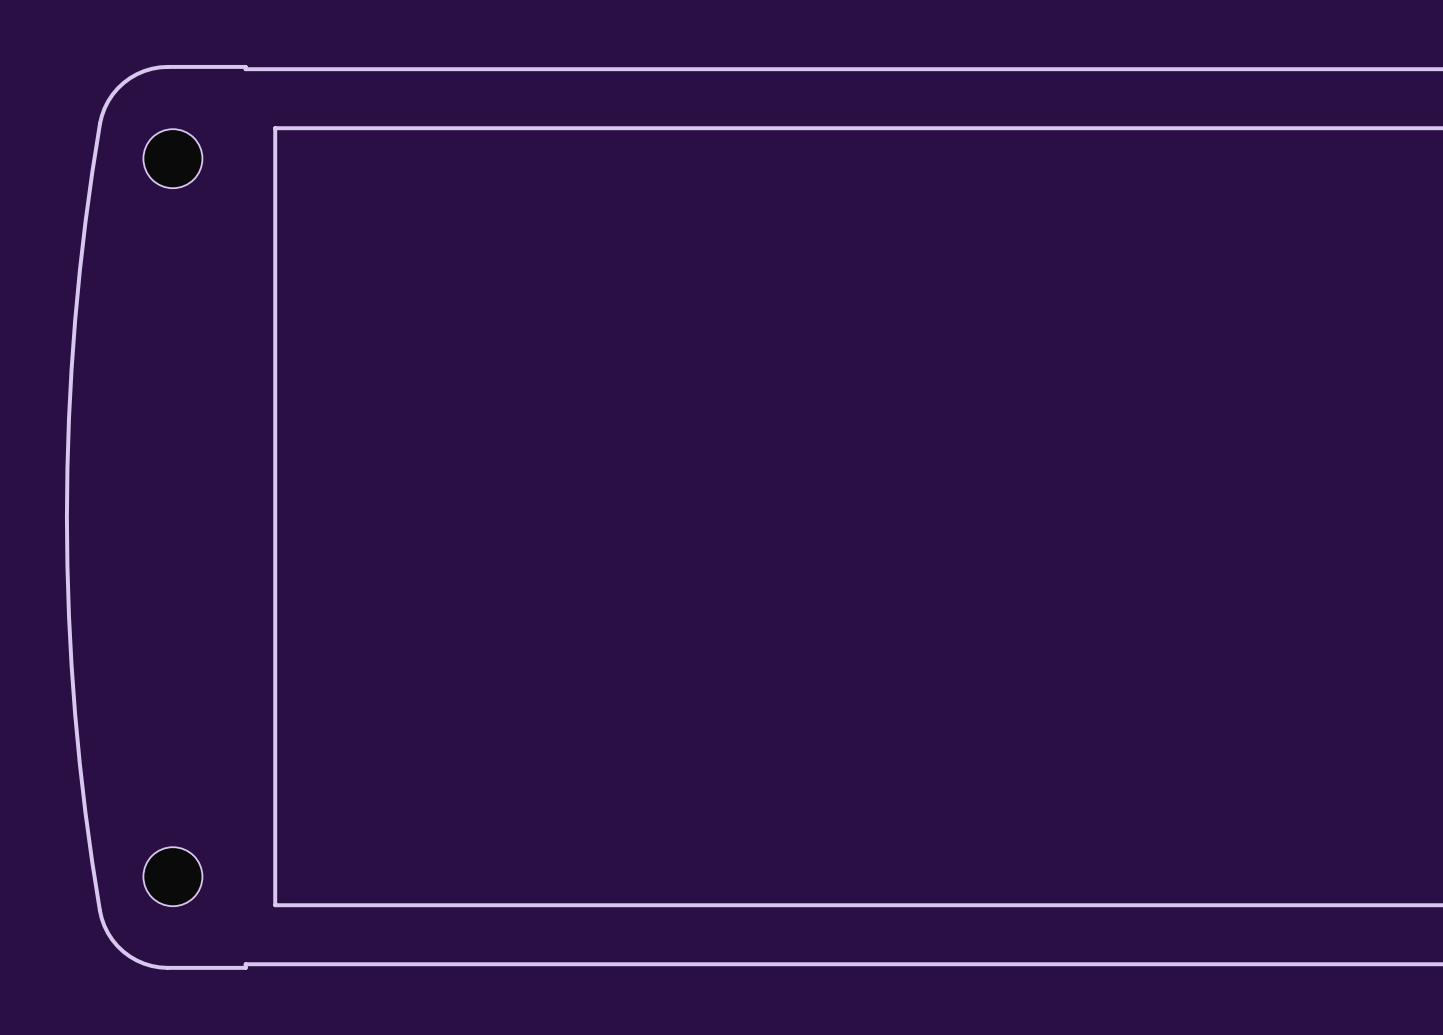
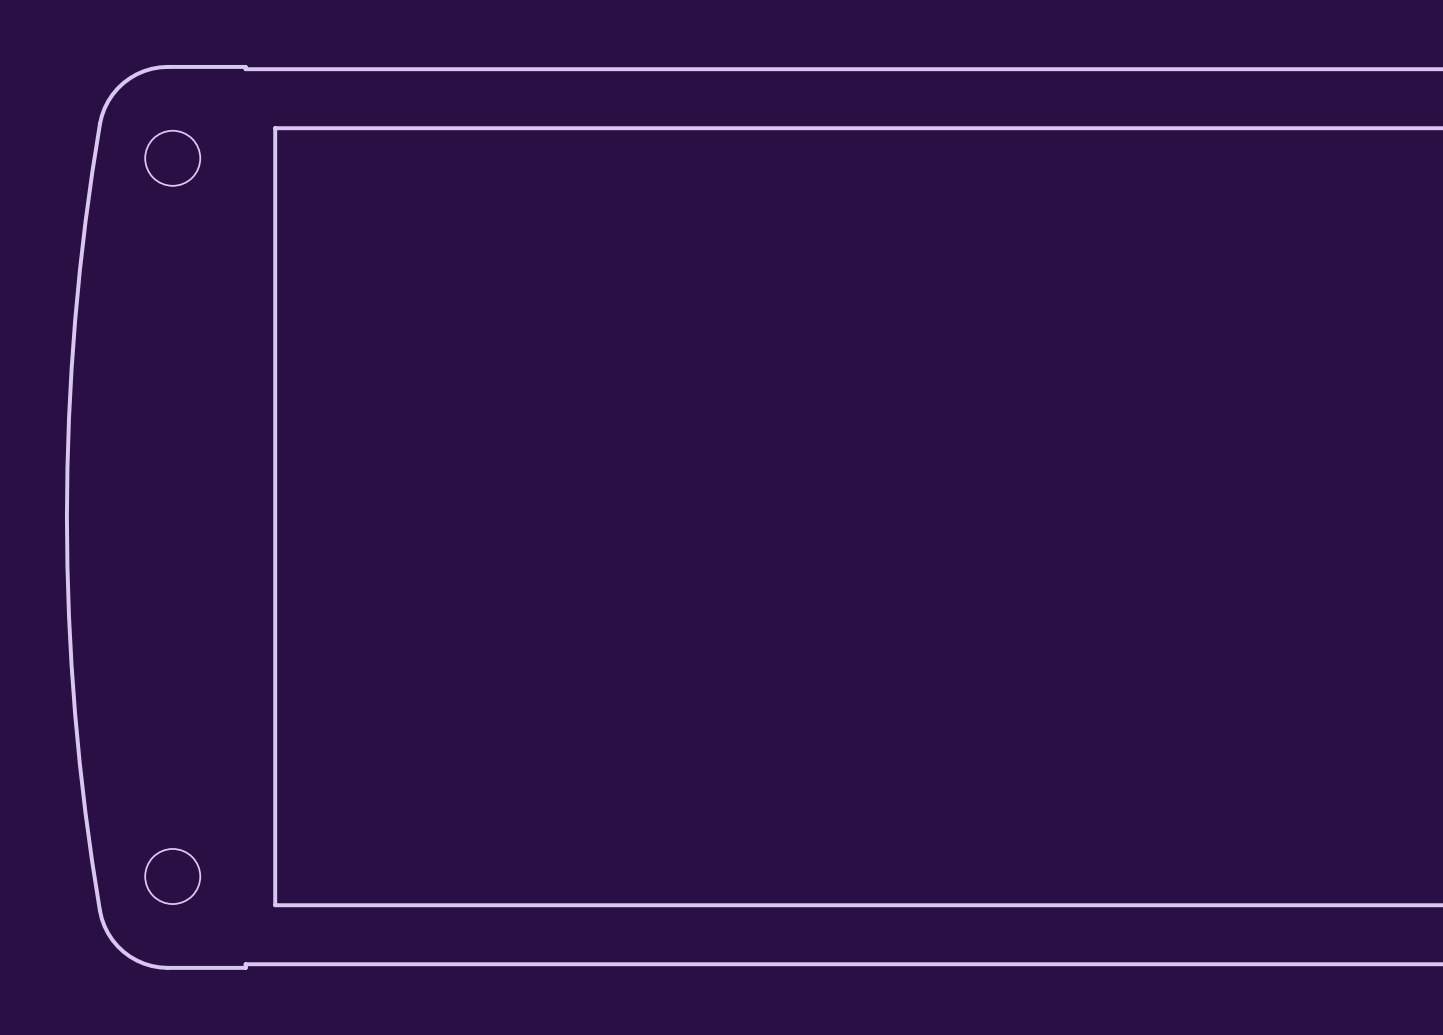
round board edge: none -> [144, 130, 201, 187]
part: (172, 158) -> none
round board edge: none -> [144, 848, 201, 905]
part: (172, 876) -> none

